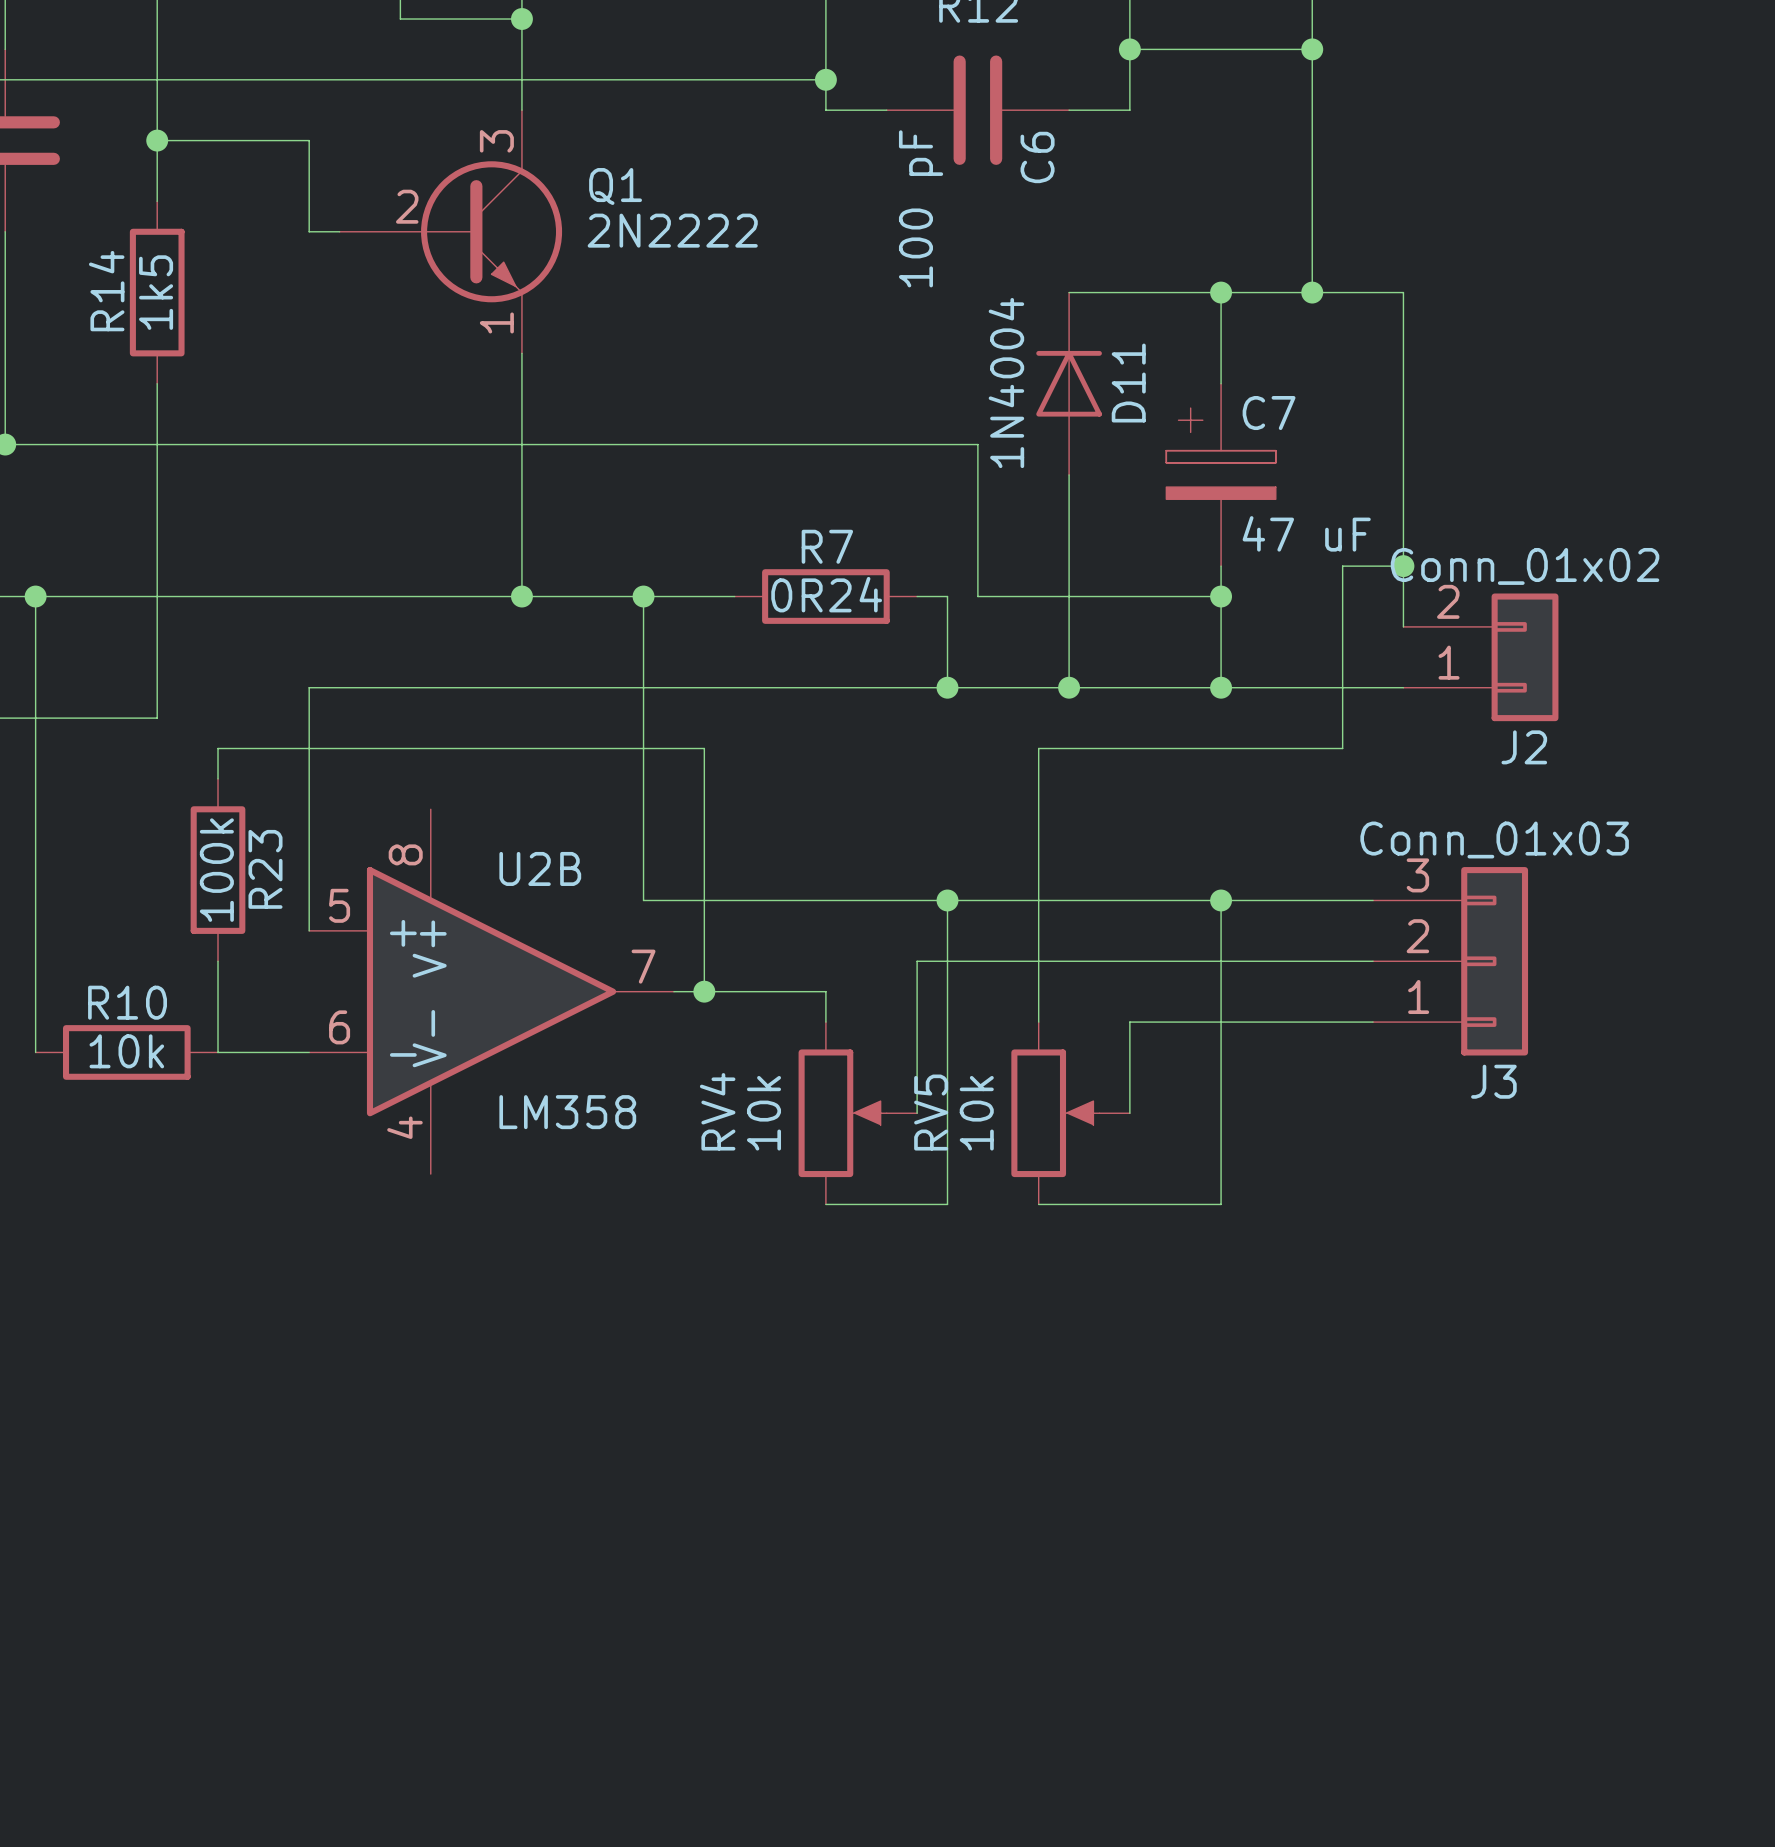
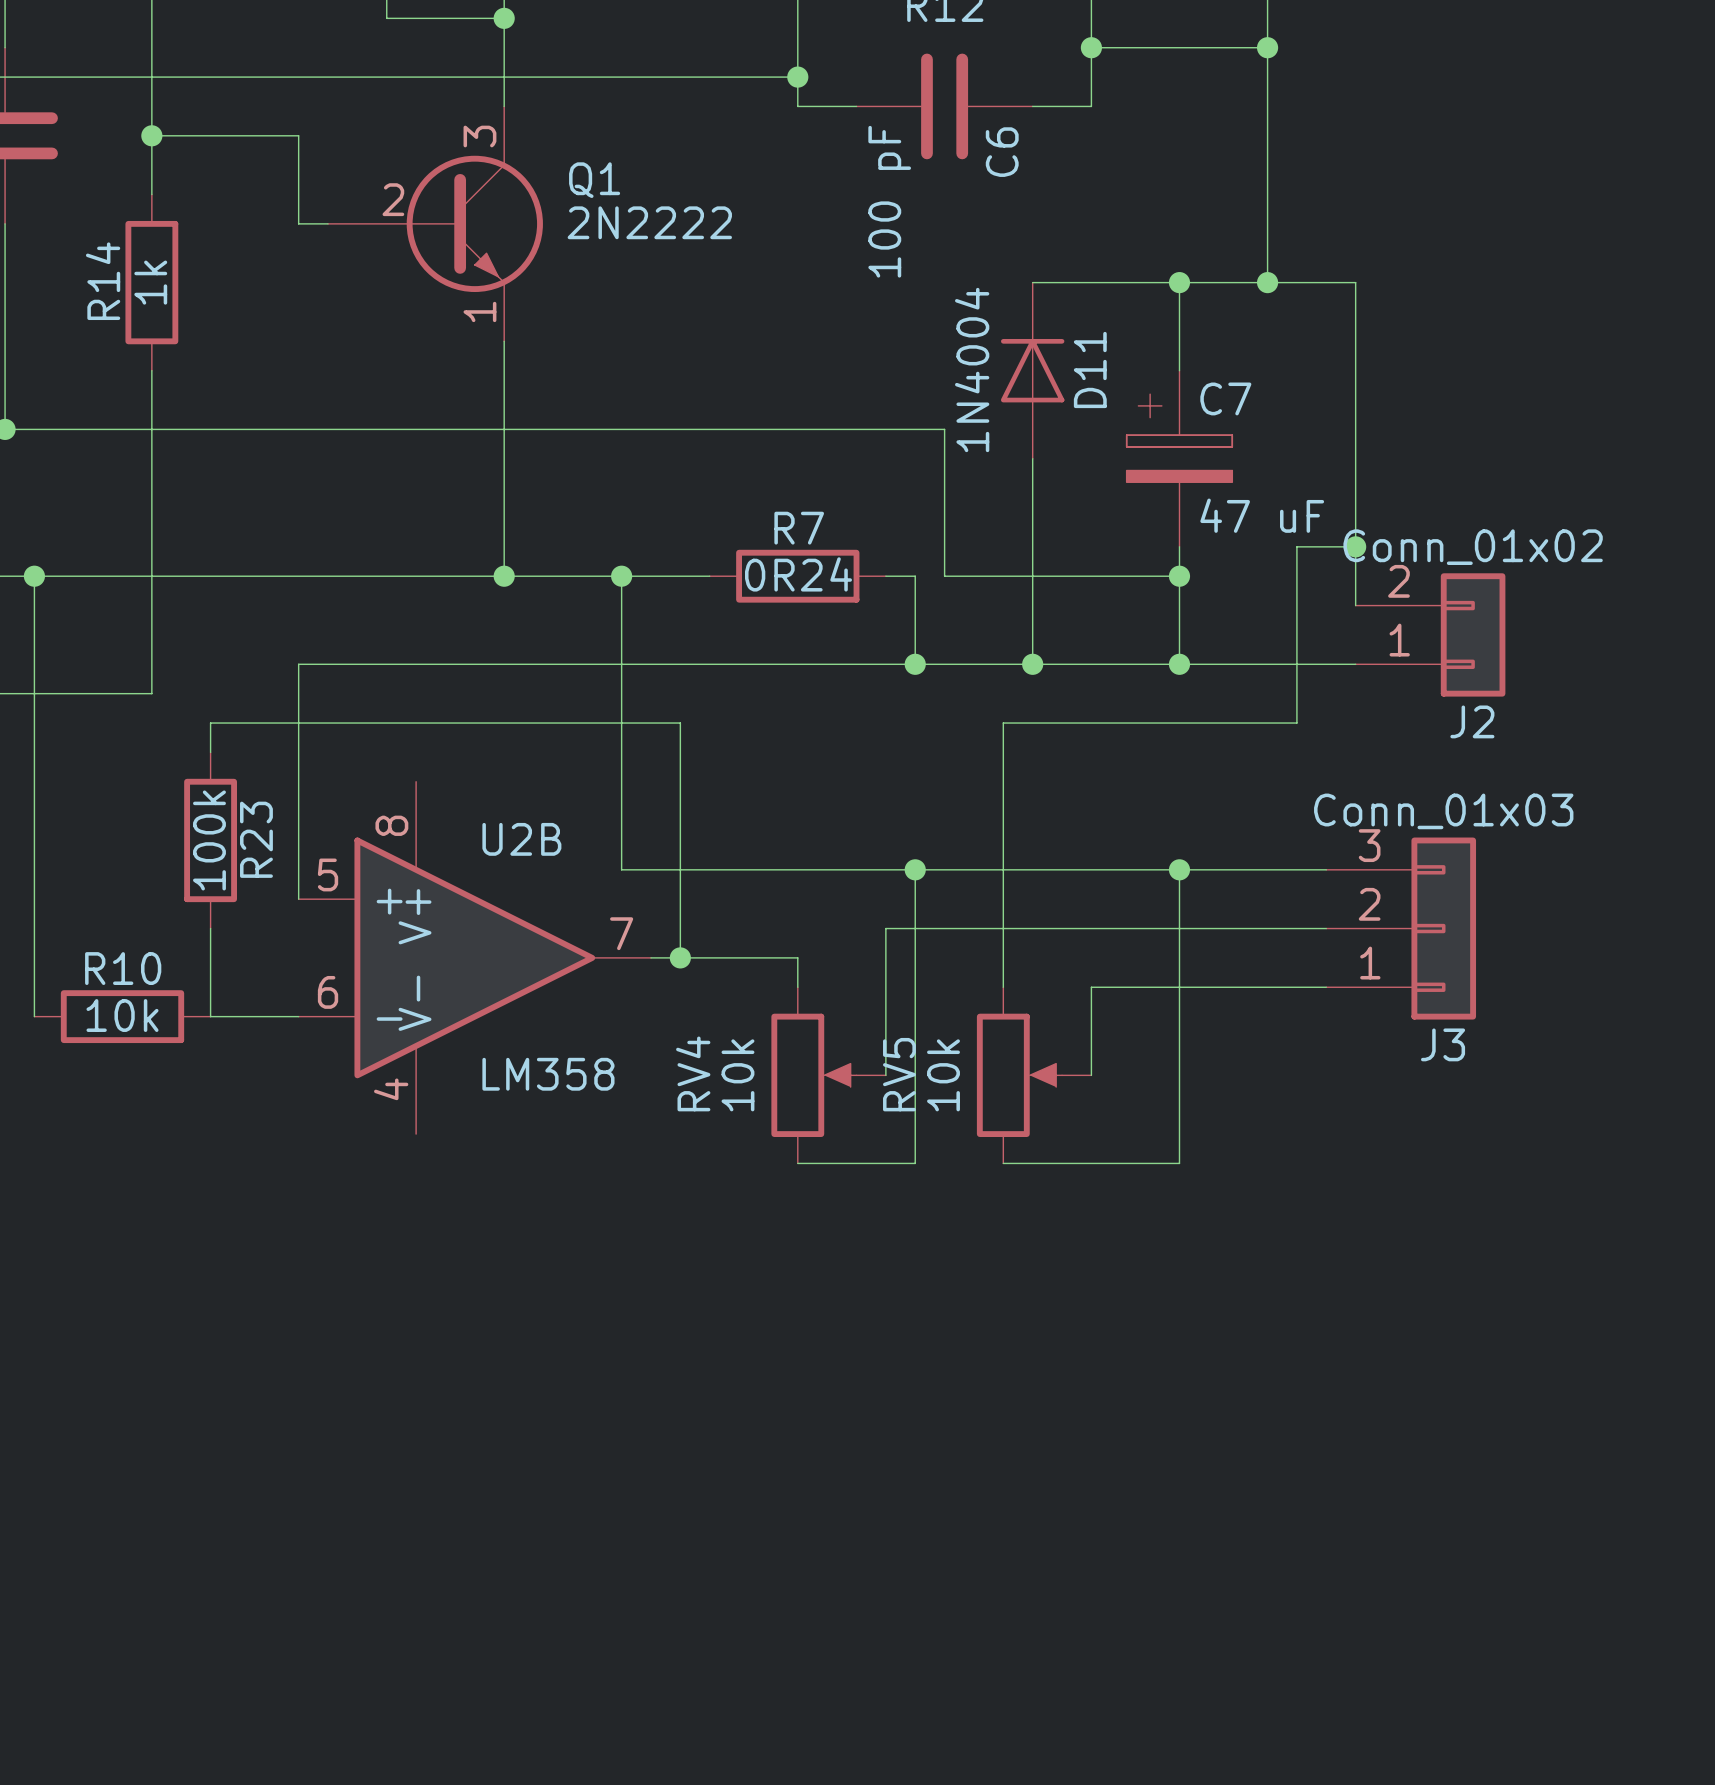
R14 value: 1k5 (156, 292) -> 1k (150, 282)

